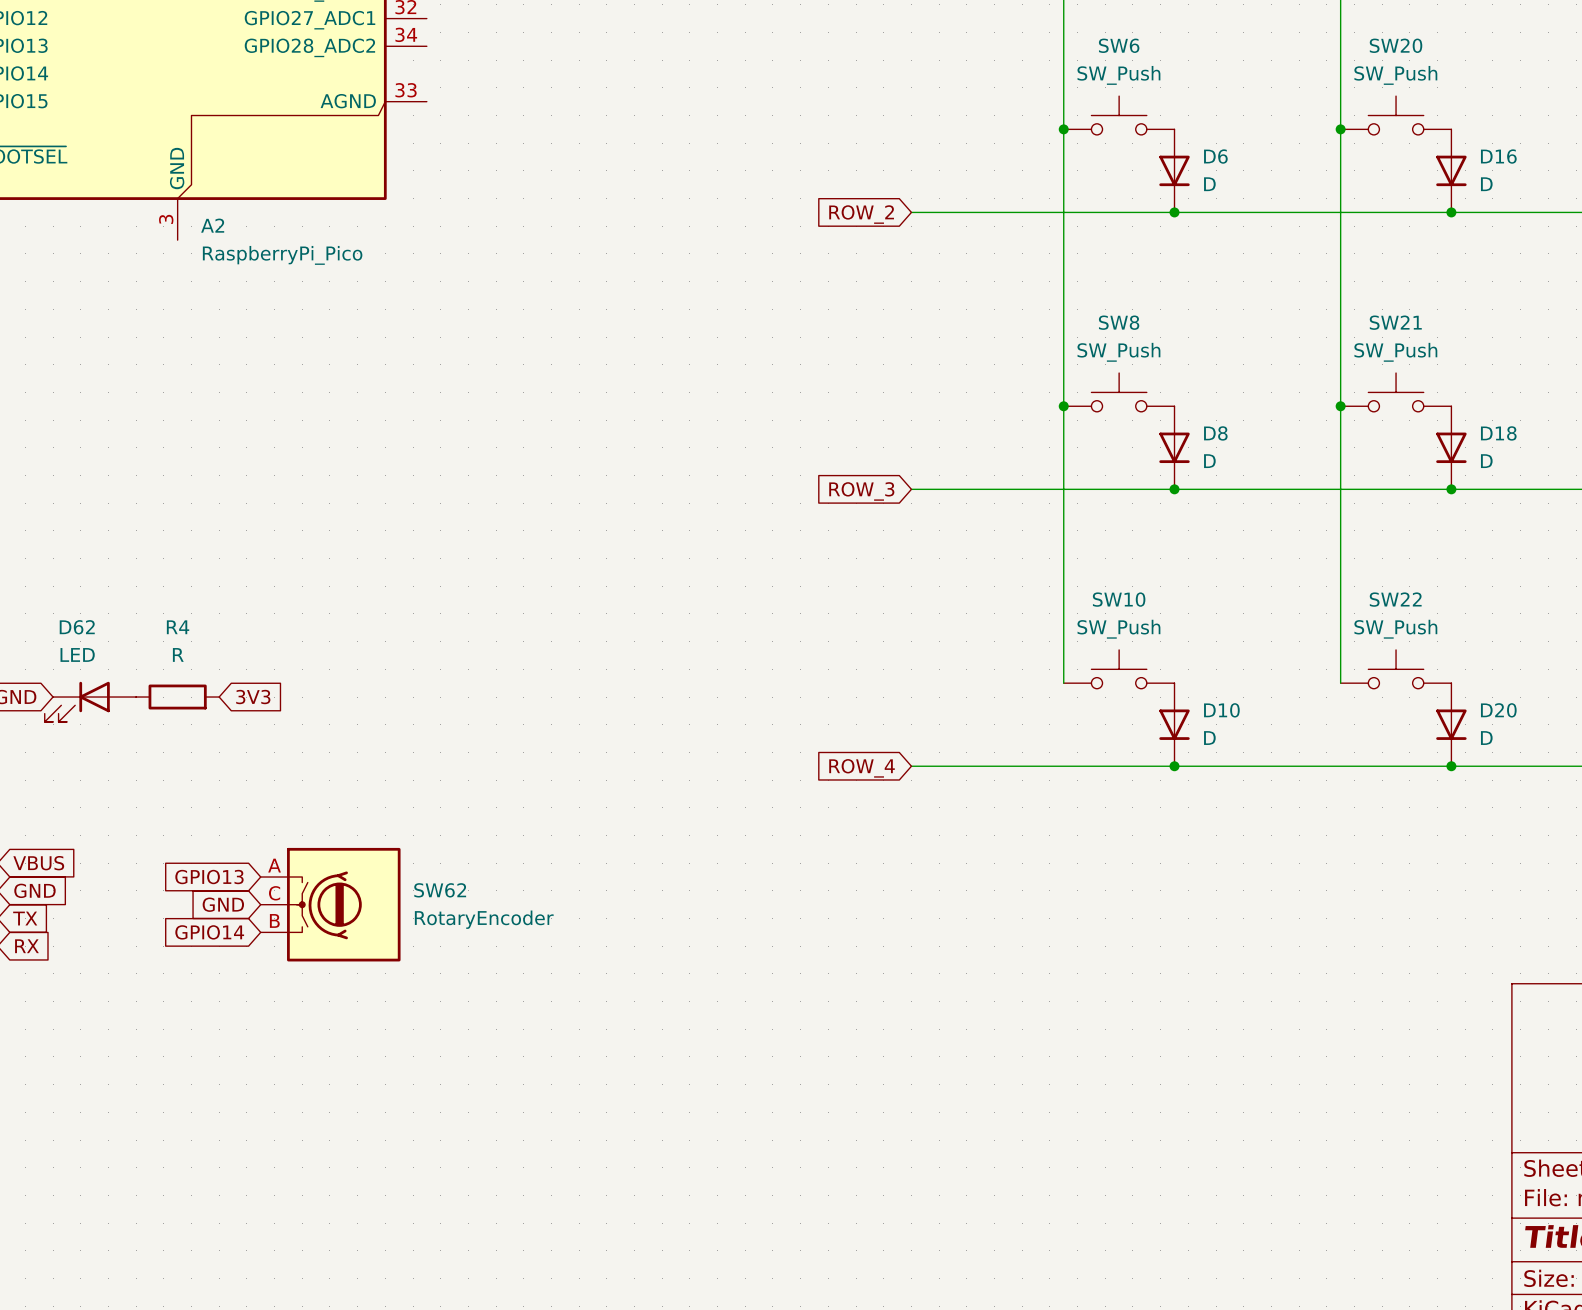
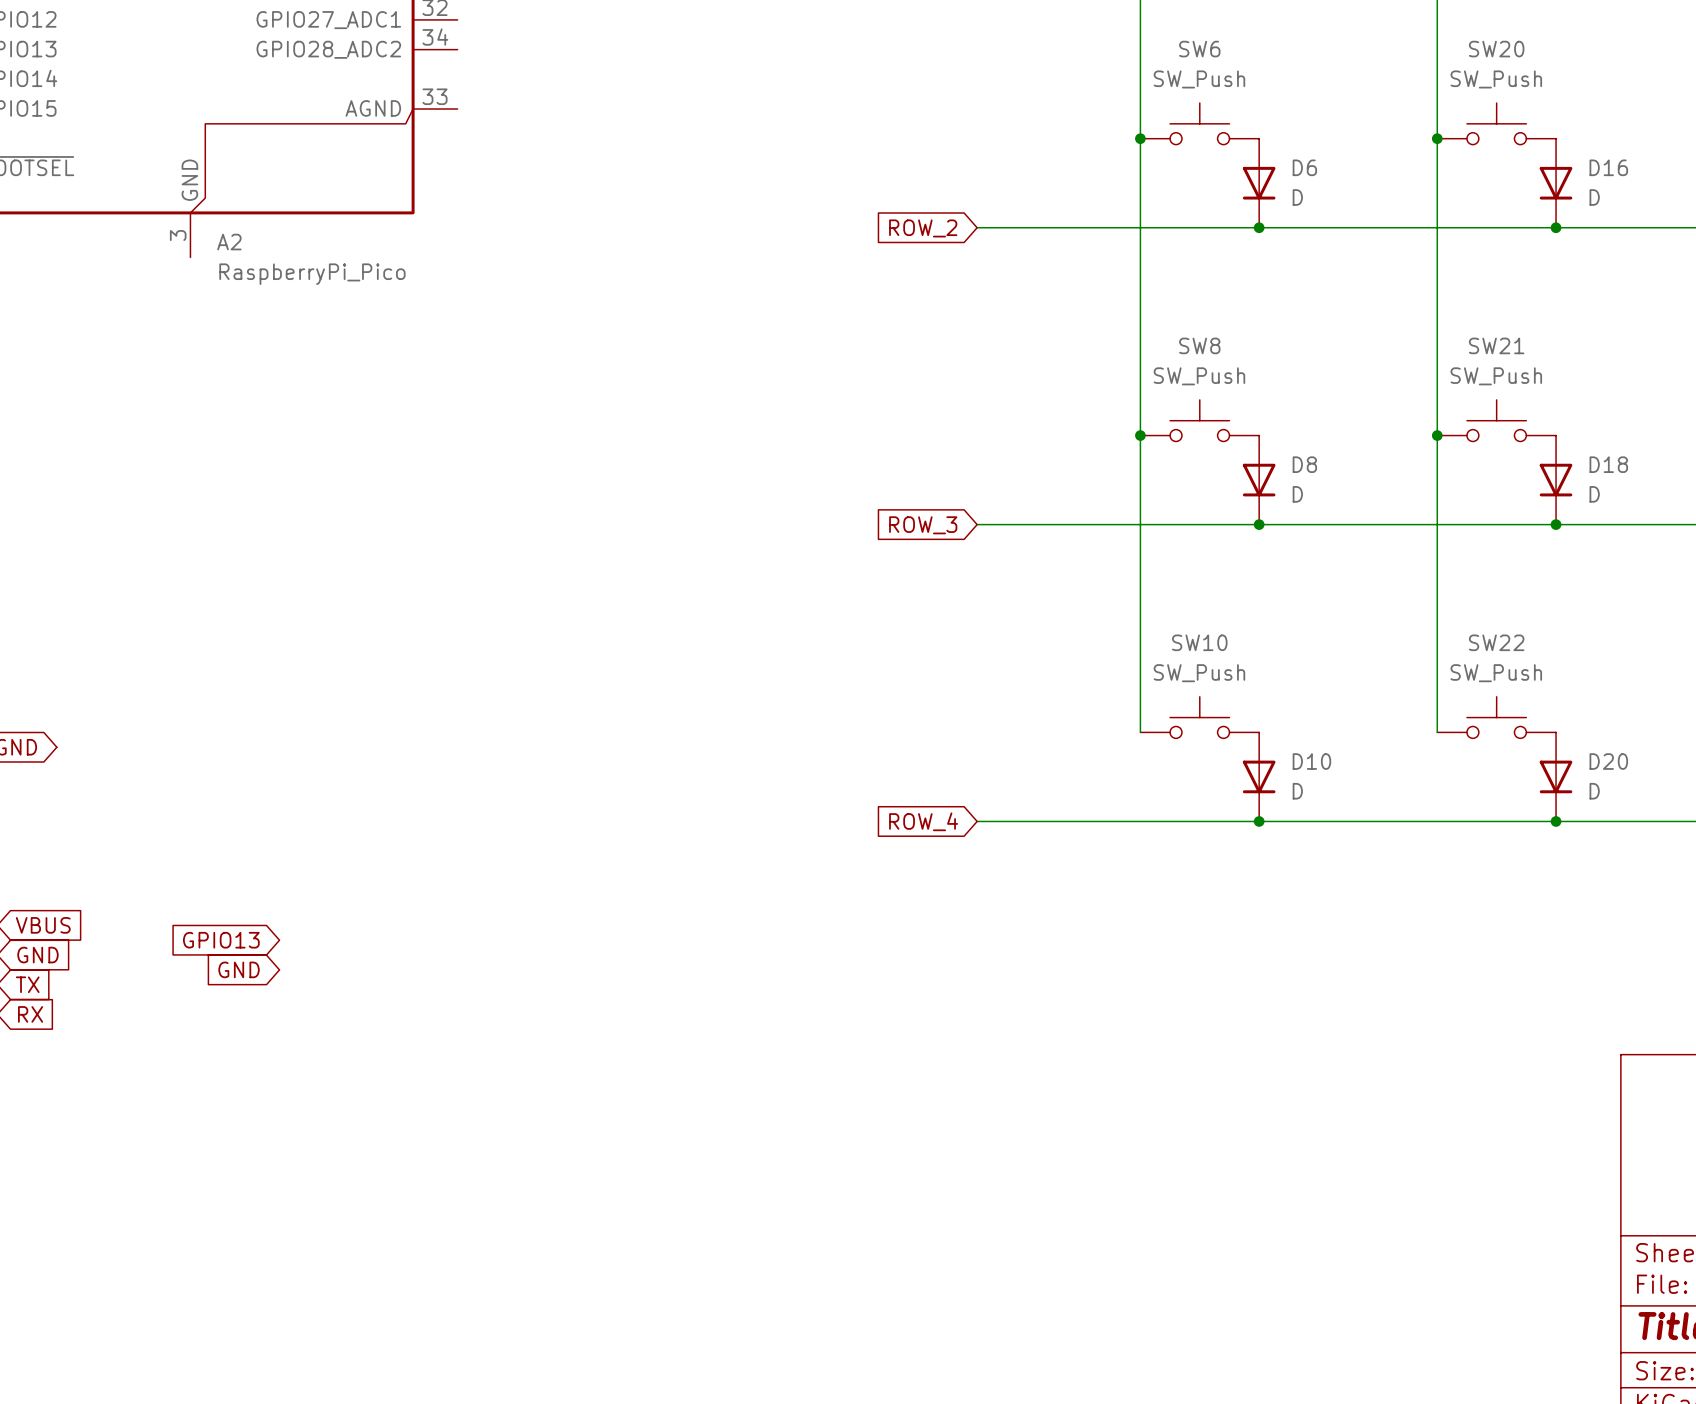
R4: R (177, 697) -> none
global label: 3V3 (253, 697) -> none
D62: LED (90, 701) -> none
SW62: RotaryEncoder (330, 904) -> none
global label: GPIO14 (209, 932) -> none

